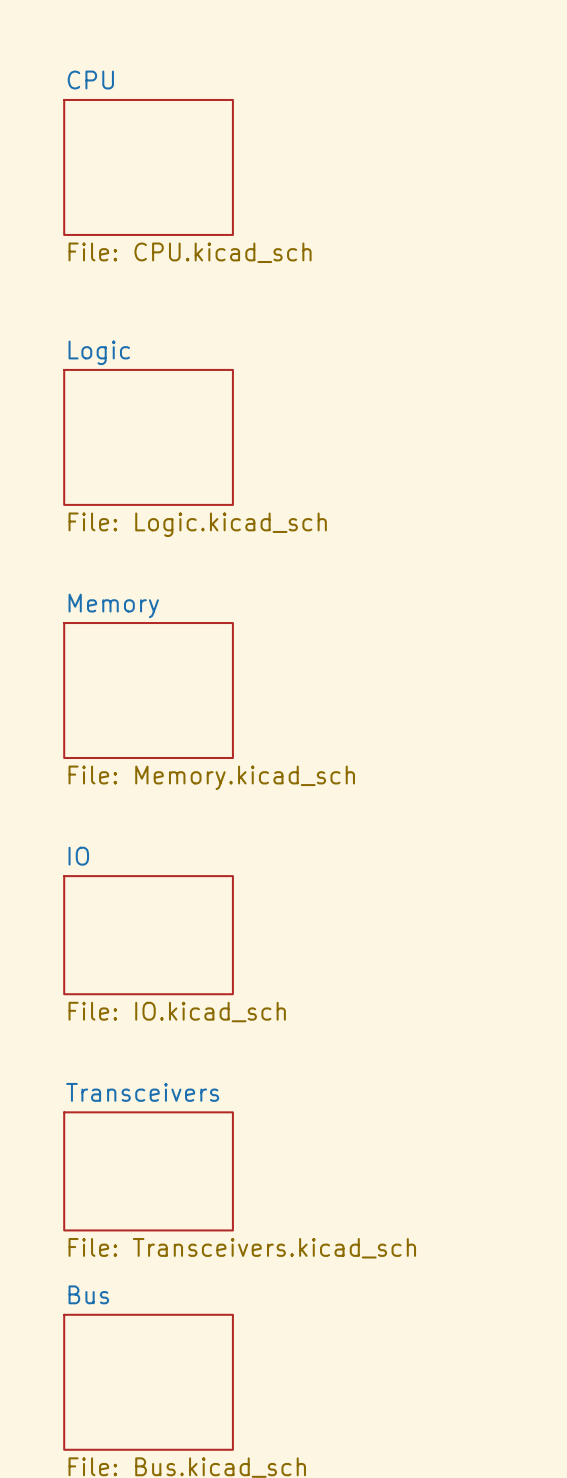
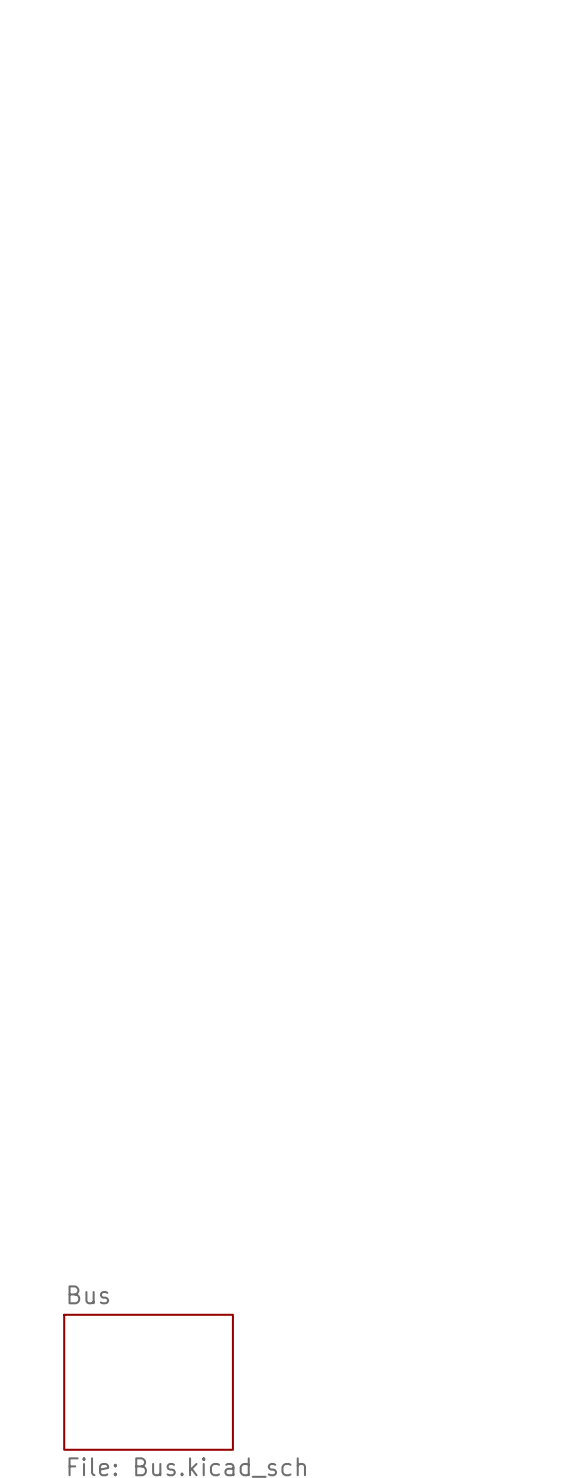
sheet CPU: File: CPU.kicad_sch (148, 167) -> none
sheet Logic: File: Logic.kicad_sch (148, 437) -> none
sheet Memory: File: Memory.kicad_sch (148, 690) -> none
sheet IO: File: IO.kicad_sch (148, 935) -> none
sheet Transceivers: File: Transceivers.kicad_sch (148, 1171) -> none

